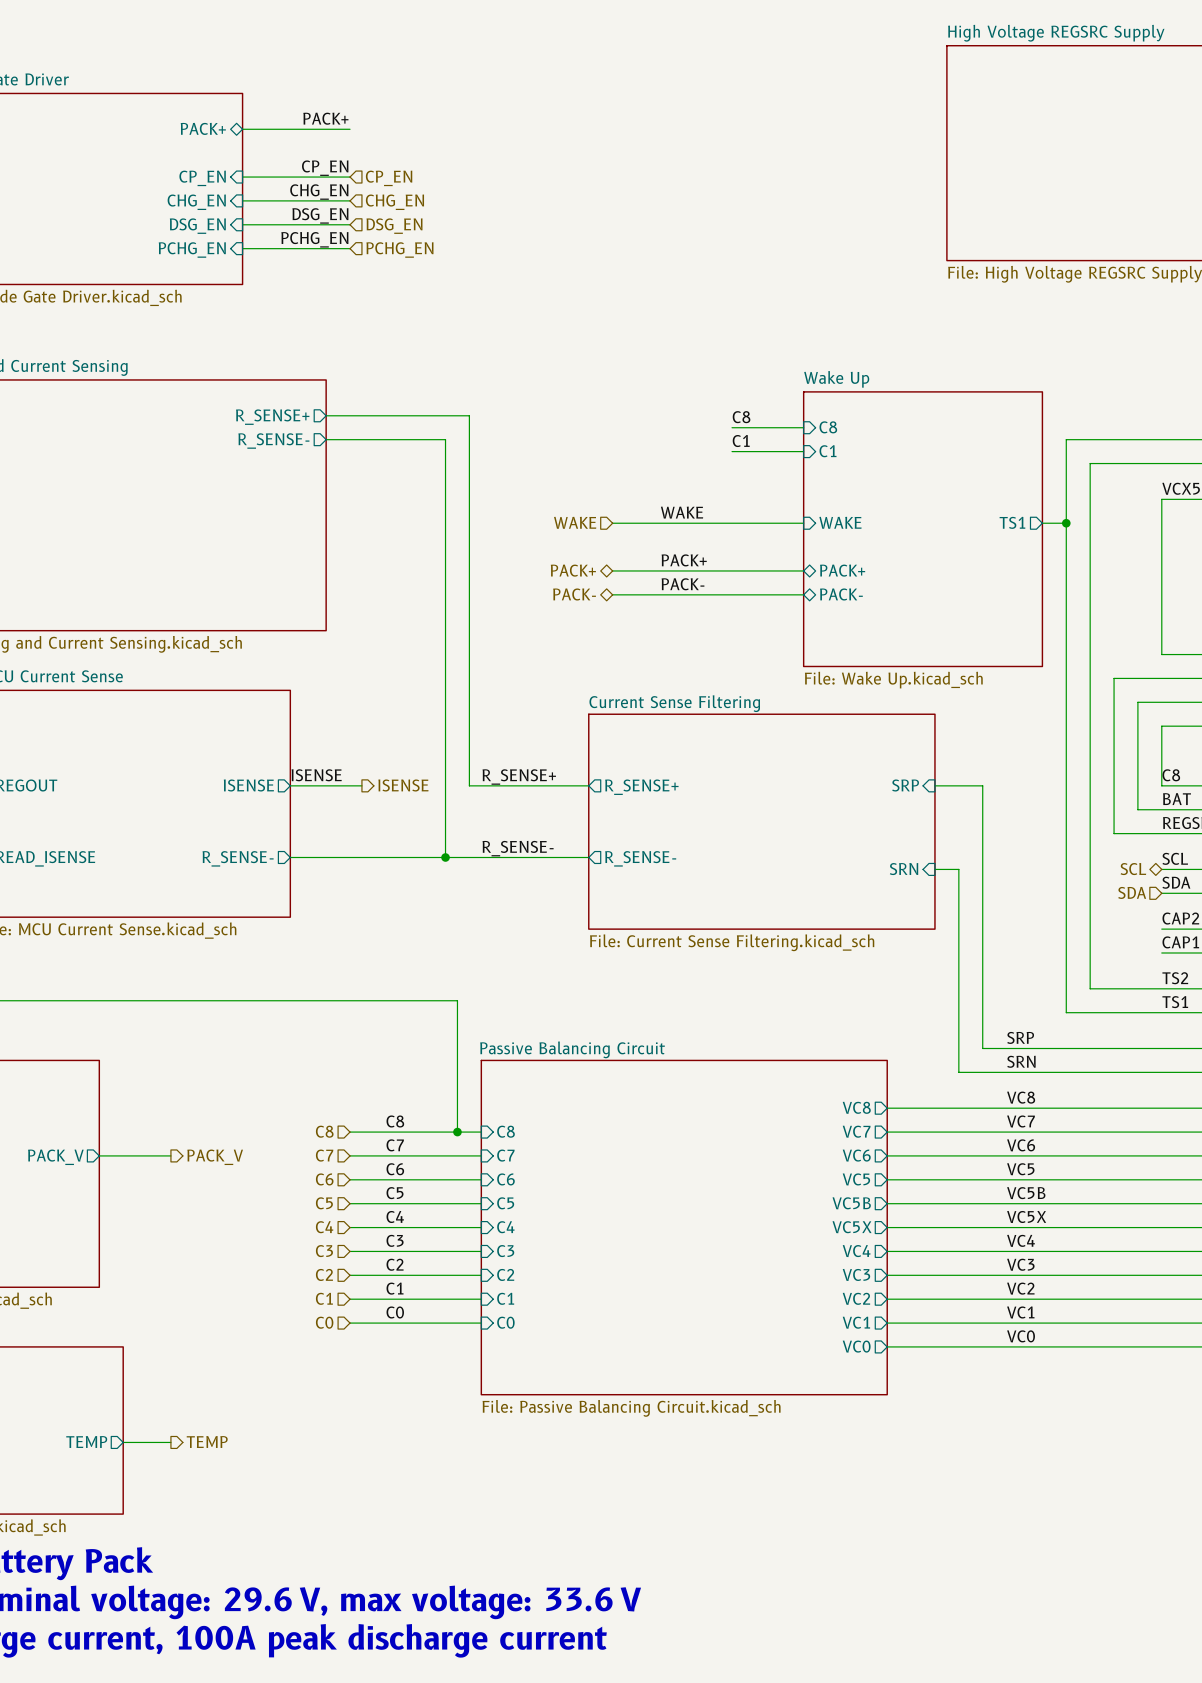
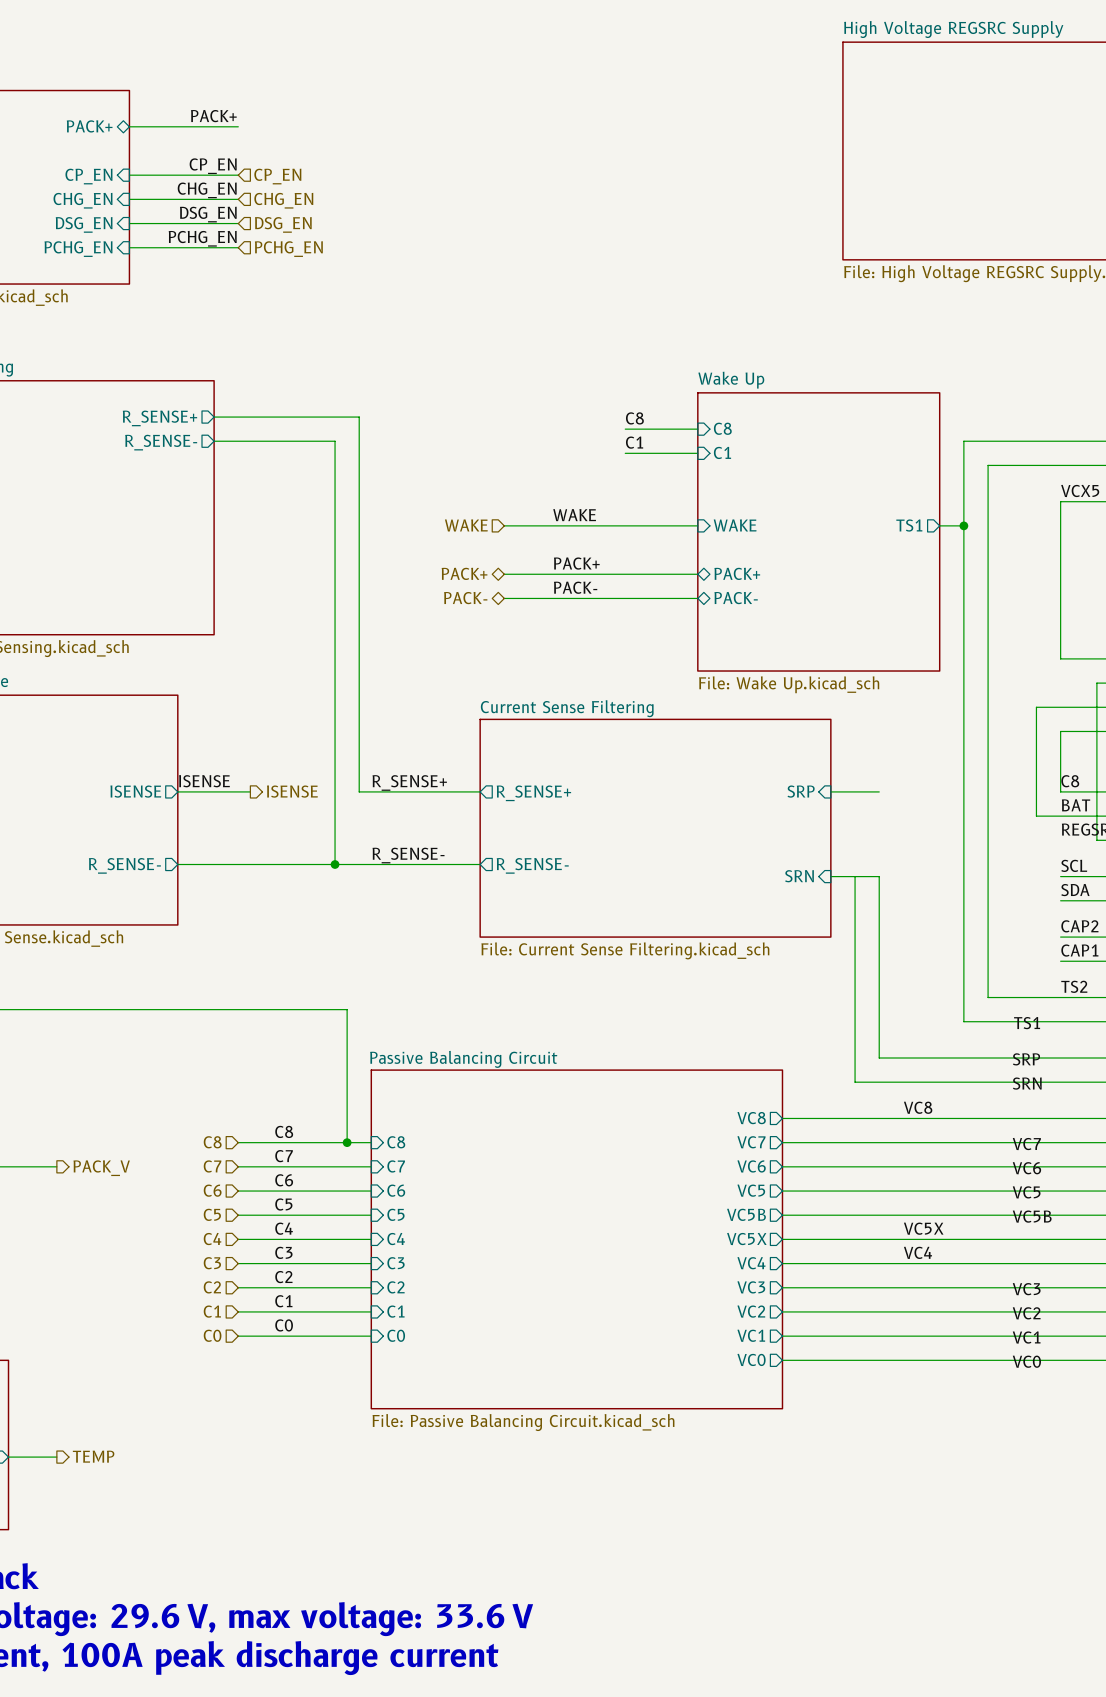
wire: (1197, 678) (1114, 678) (1114, 833) (1197, 833) -> (1096, 683) (1096, 840)
wire: (982, 785) (982, 869) -> (855, 876) (879, 876)
hierarchical label: SCL (1133, 869) -> none
hierarchical label: SDA (1132, 892) -> none
label position: TS1 (1175, 1002) -> TS1 (1027, 1023)
label position: SRP (1020, 1037) -> SRP (1026, 1059)
label position: SRN (1021, 1061) -> SRN (1027, 1083)
label position: VC7 (1021, 1121) -> VC7 (1026, 1144)
label position: VC6 (1021, 1145) -> VC6 (1026, 1168)
label position: VC5 (1020, 1169) -> VC5 (1026, 1192)
label position: VC5B (1026, 1193) -> VC5B (1032, 1216)
label position: VC3 (1020, 1264) -> VC3 (1026, 1289)
label position: VC2 (1020, 1288) -> VC2 (1026, 1313)
label position: VC1 (1020, 1312) -> VC1 (1026, 1337)
label position: VC0 (1021, 1336) -> VC0 (1026, 1361)

